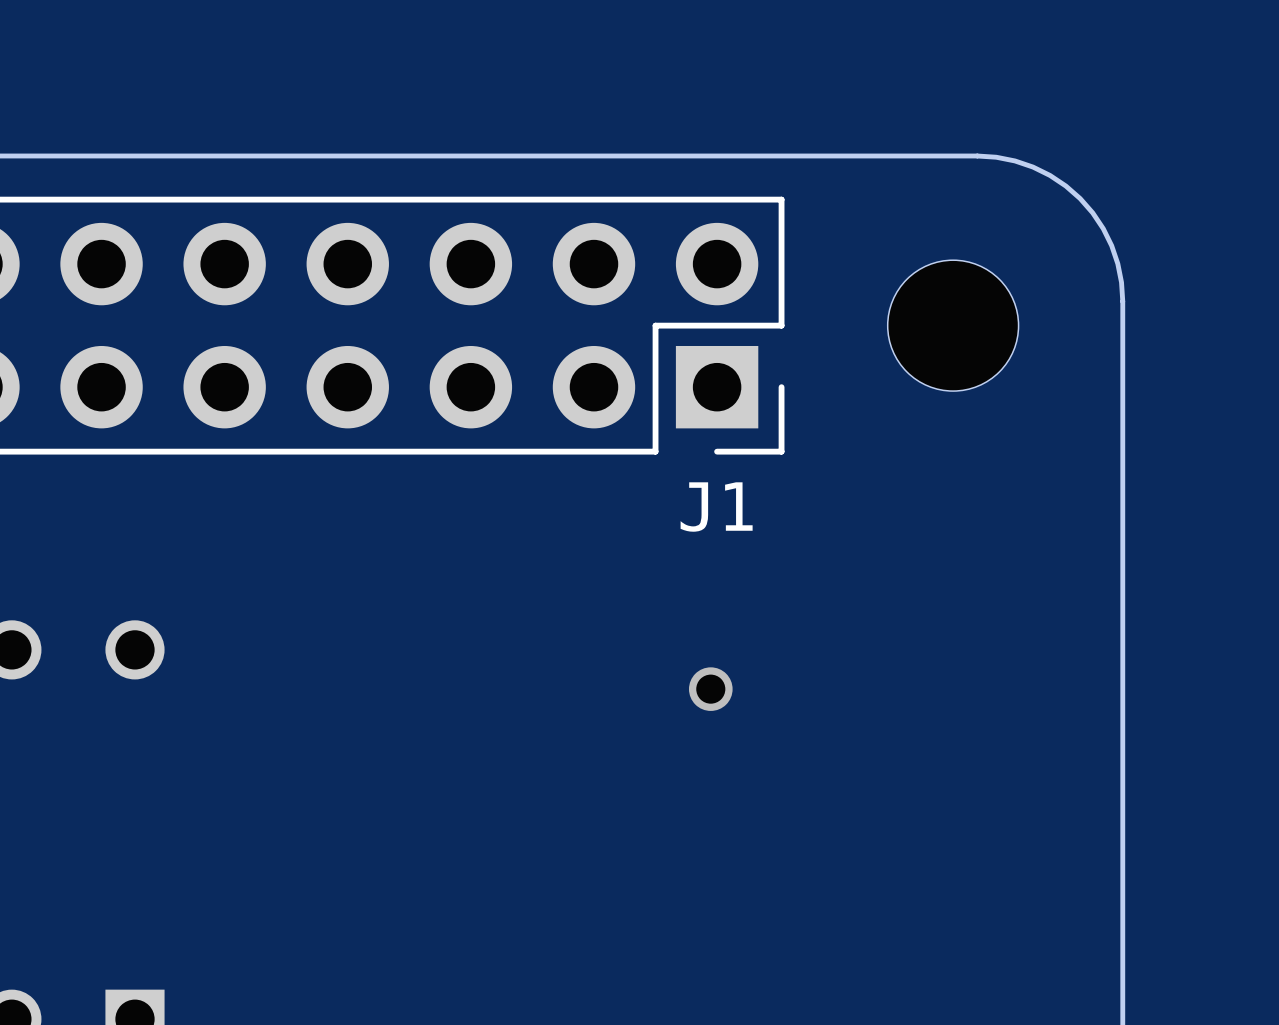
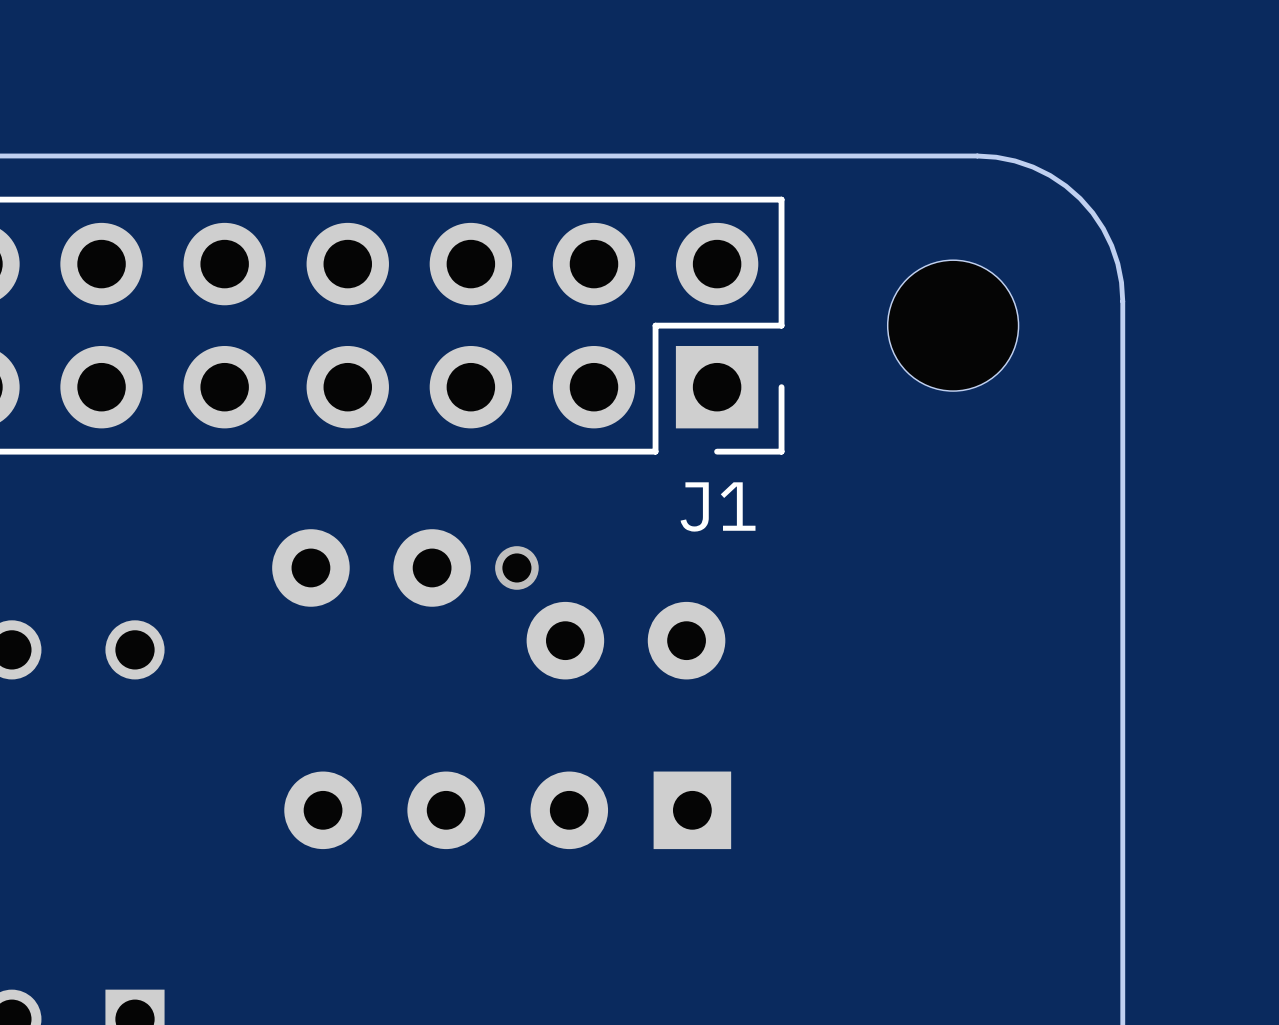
part: none -> (371, 567)
part: none -> (625, 640)
via position: (710, 689) -> (516, 567)
part: none -> (507, 810)

